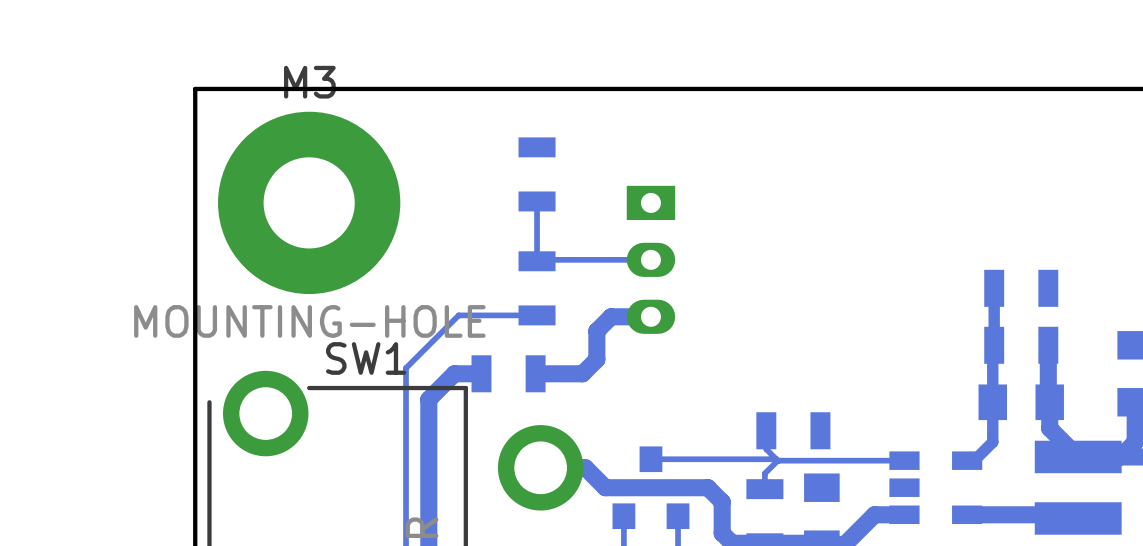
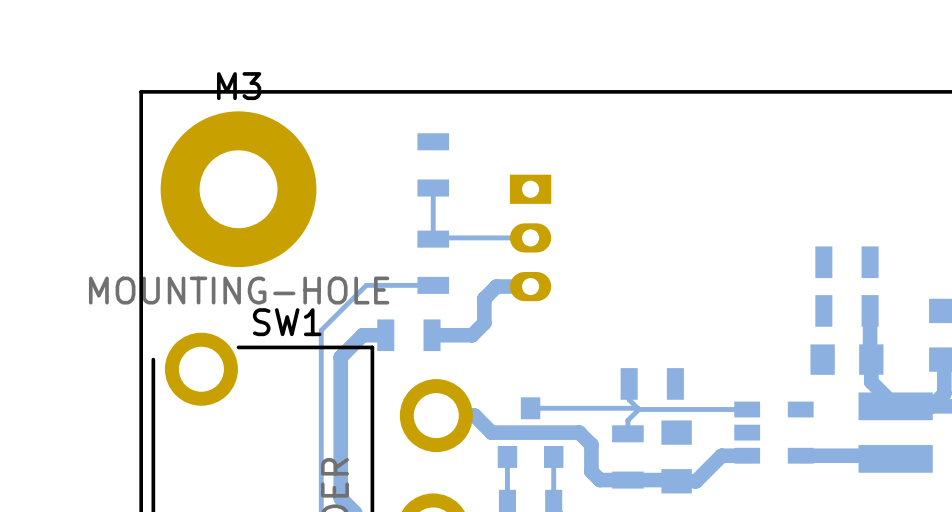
bottom track: (994, 288) (992, 442) (974, 460) (967, 460) -> none

